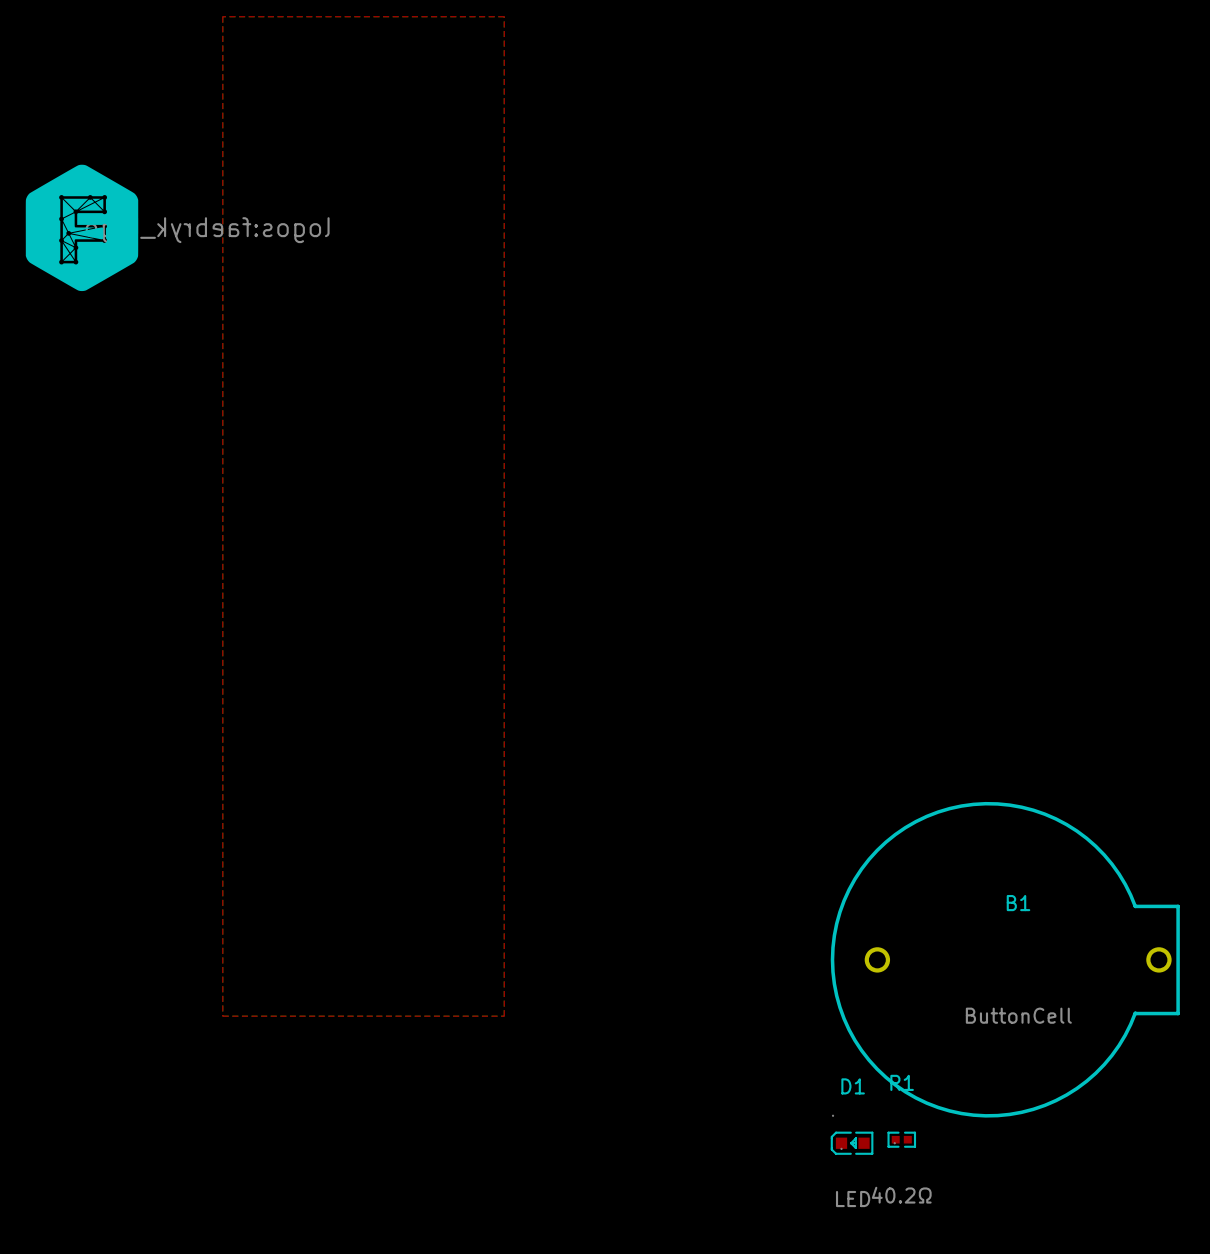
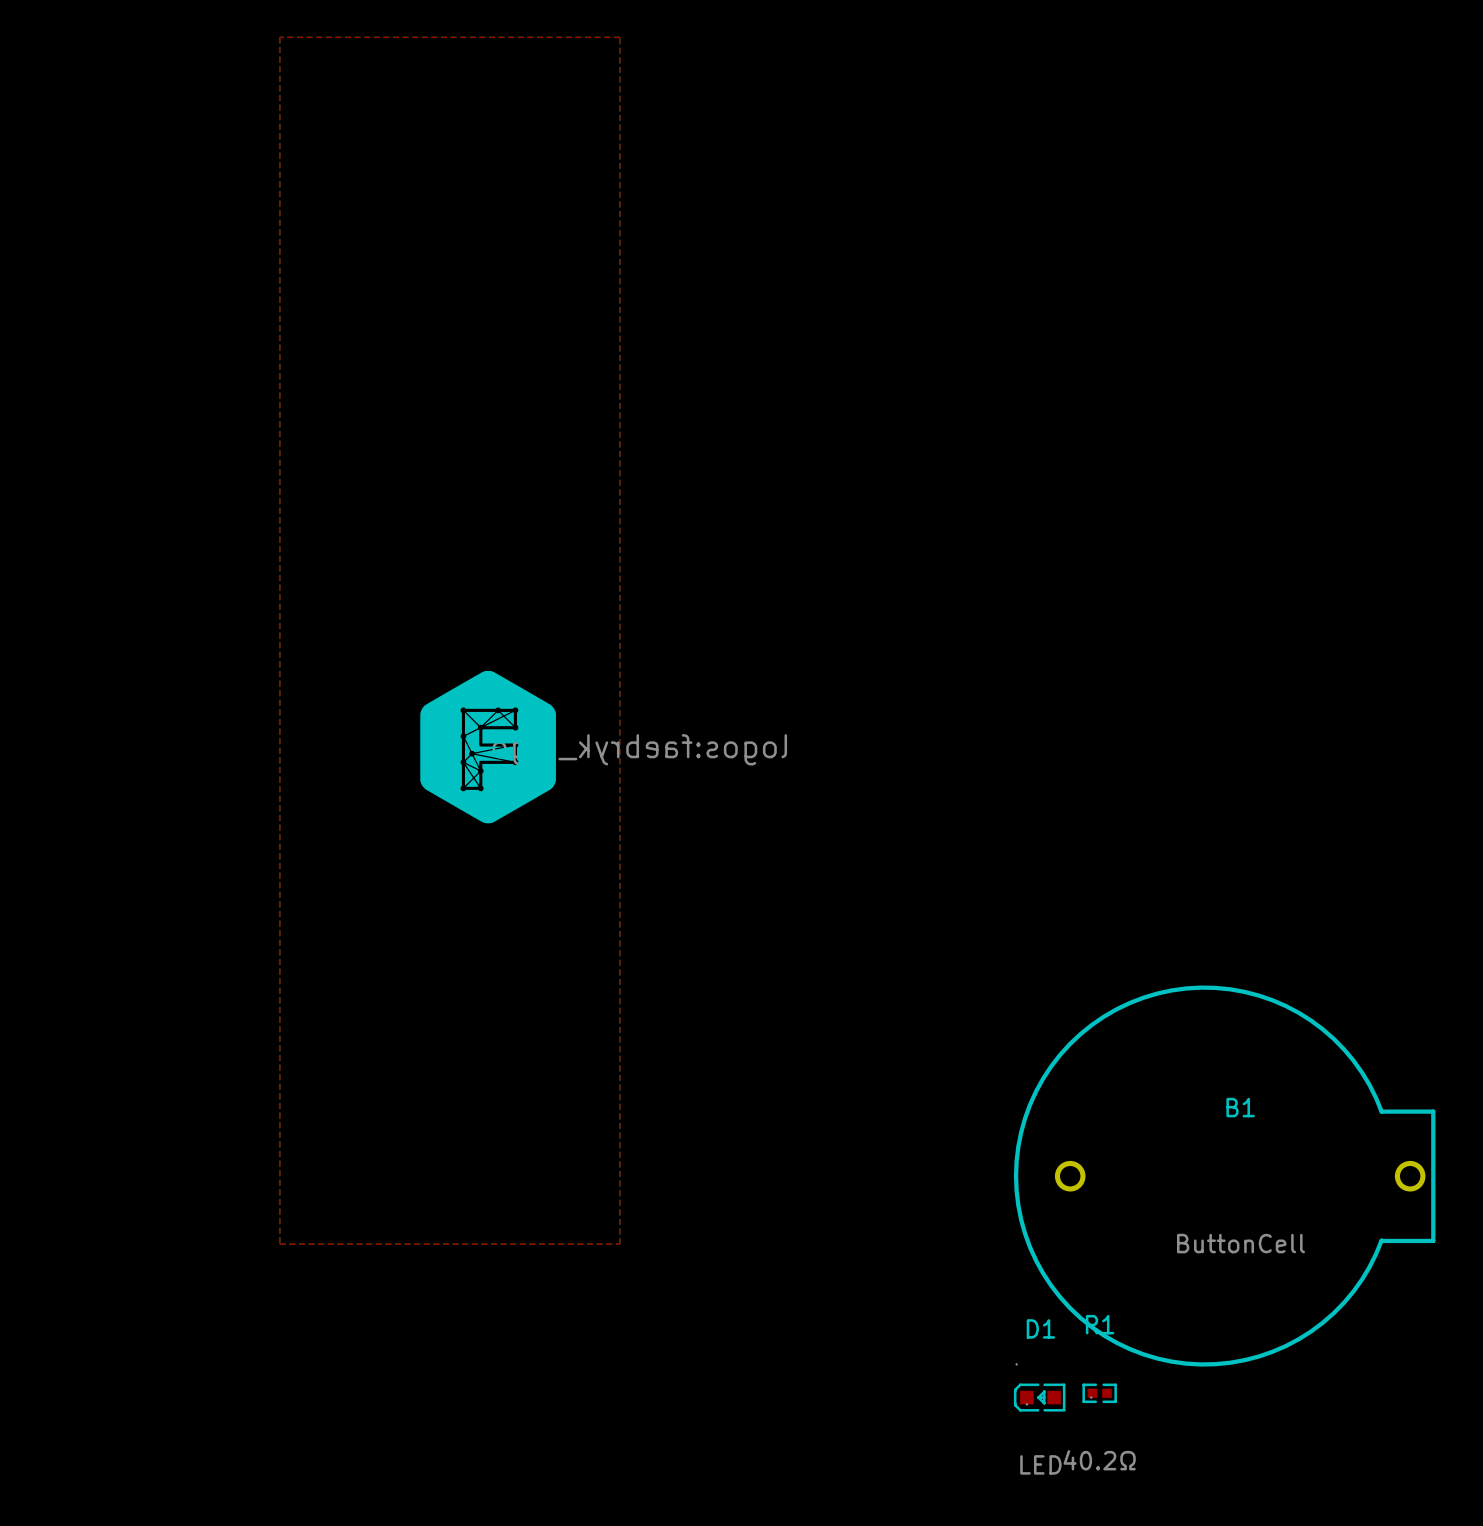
drawing: [25, 164, 139, 292] -> none
drawing: none -> [420, 670, 556, 824]

